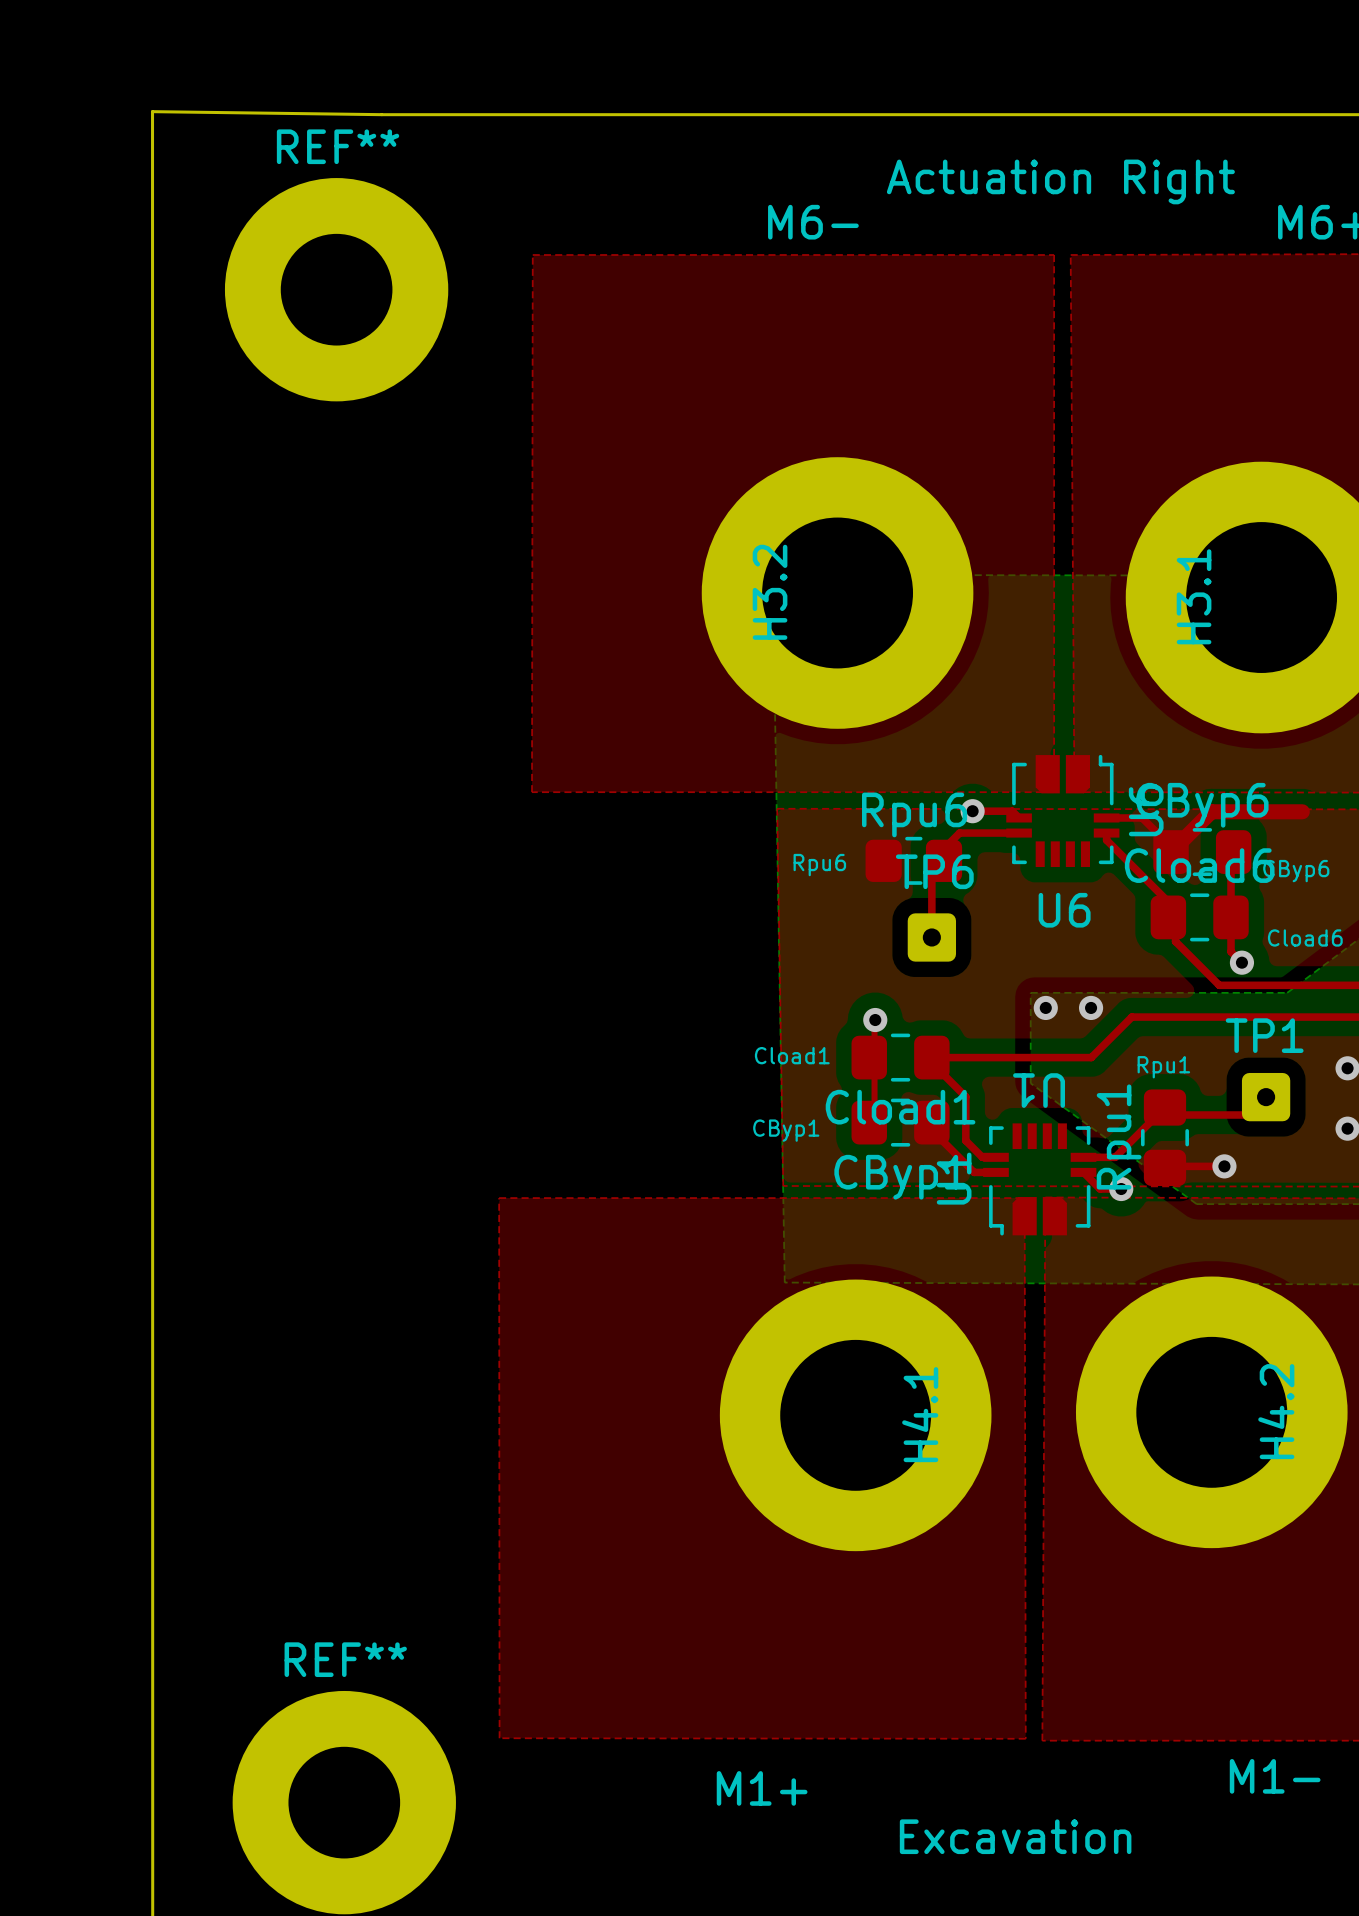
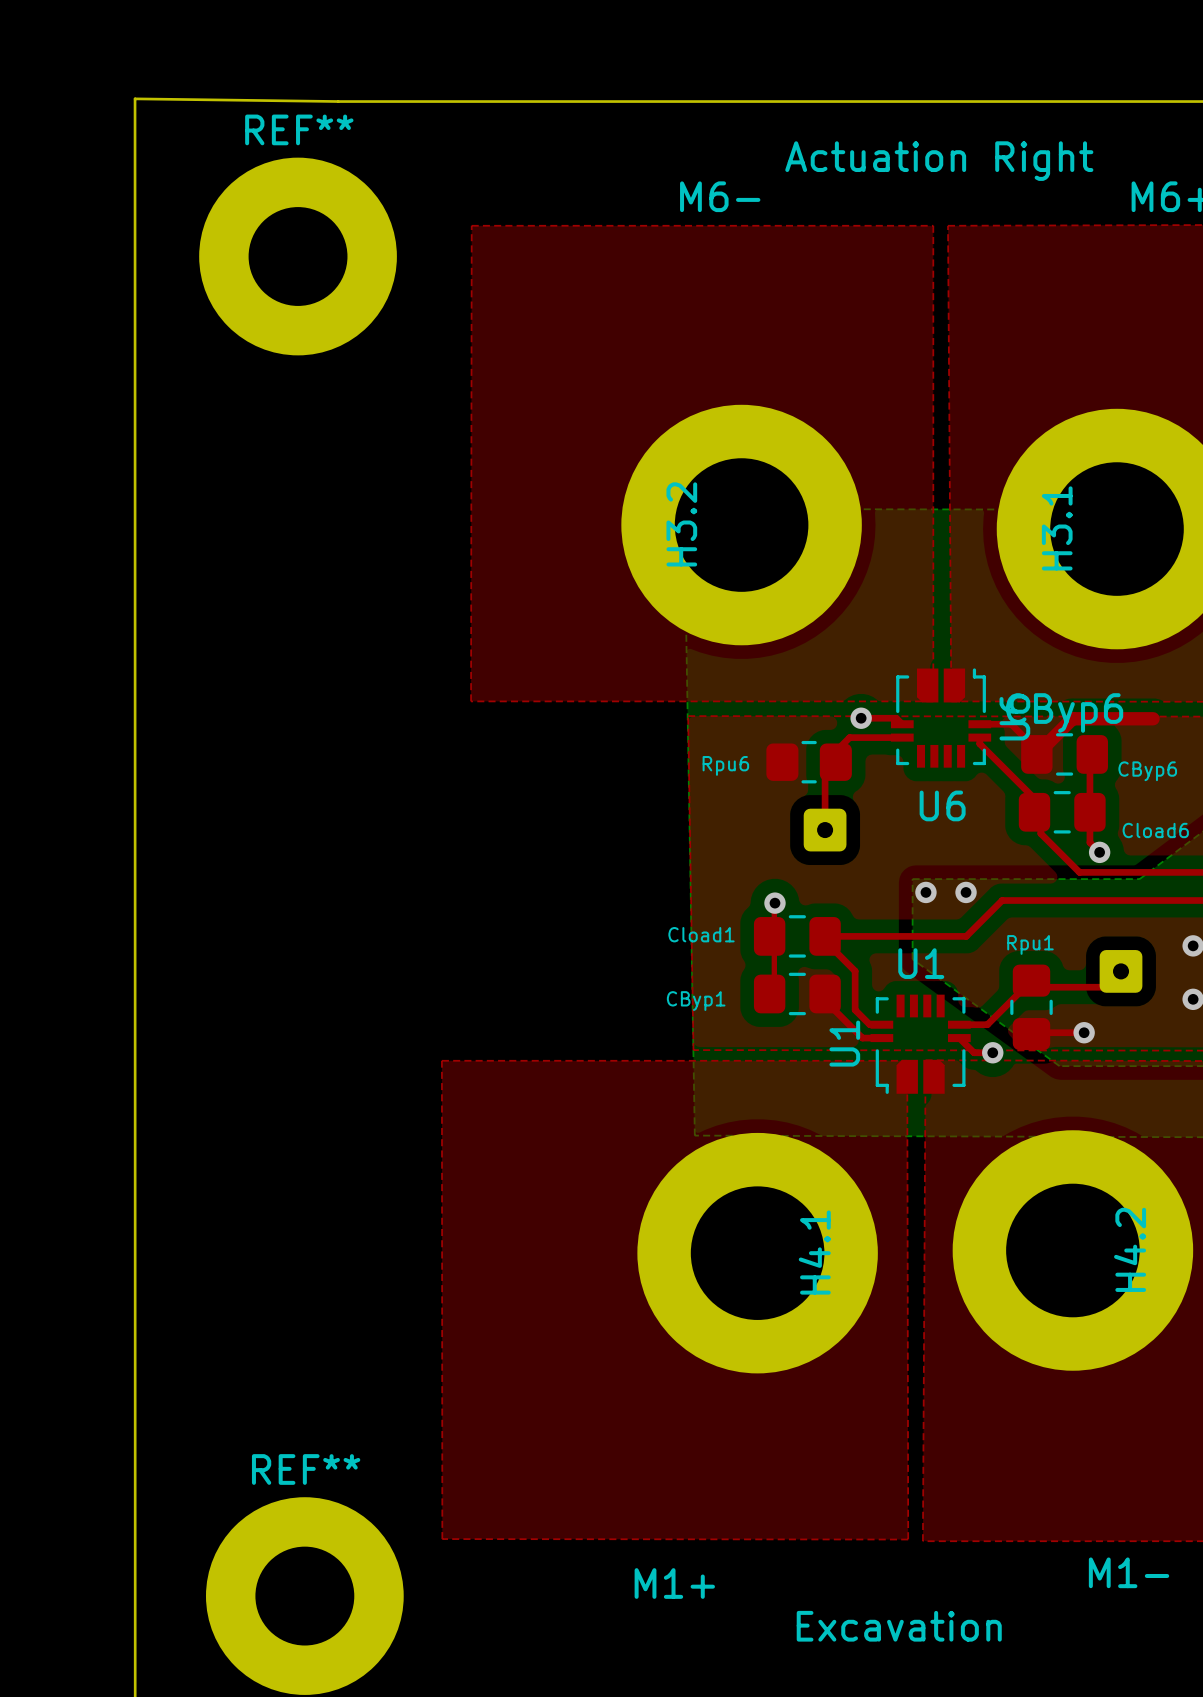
Rpu6 name: Rpu6 (914, 814) -> none
Cload6 name: Cload6 (1199, 865) -> none
TP6 name: TP6 (934, 871) -> none
TP1 name: TP1 (1264, 1035) -> none
text rotation: 0° (1039, 1090) -> 180° (921, 963)
Cload1 name: Cload1 (900, 1107) -> none
Rpu1 name: Rpu1 (1119, 1136) -> none
CByp1 name: CByp1 (900, 1177) -> none

